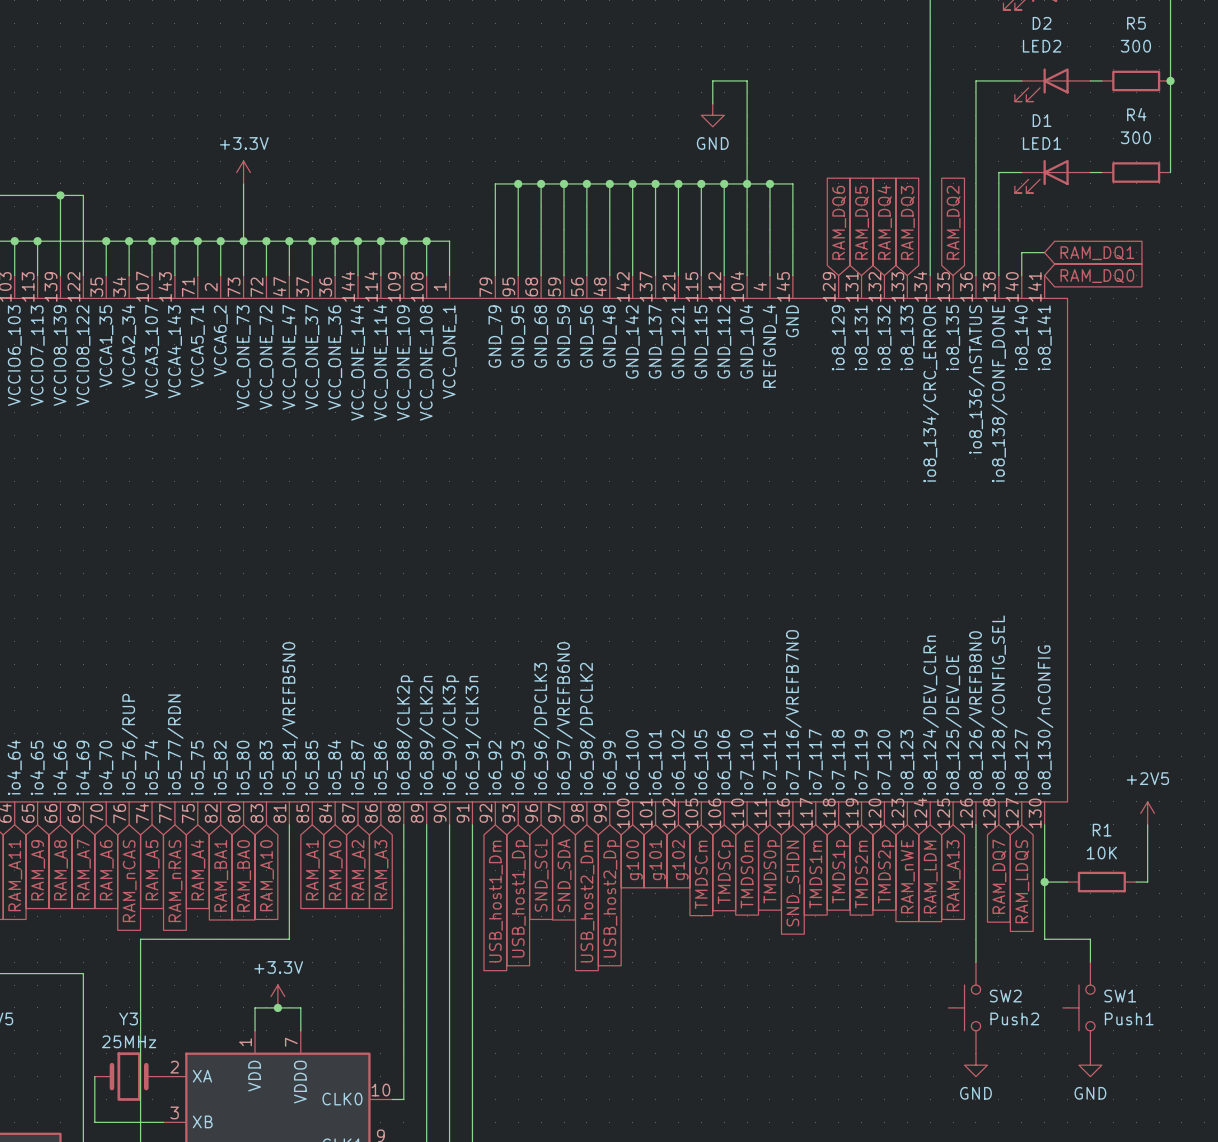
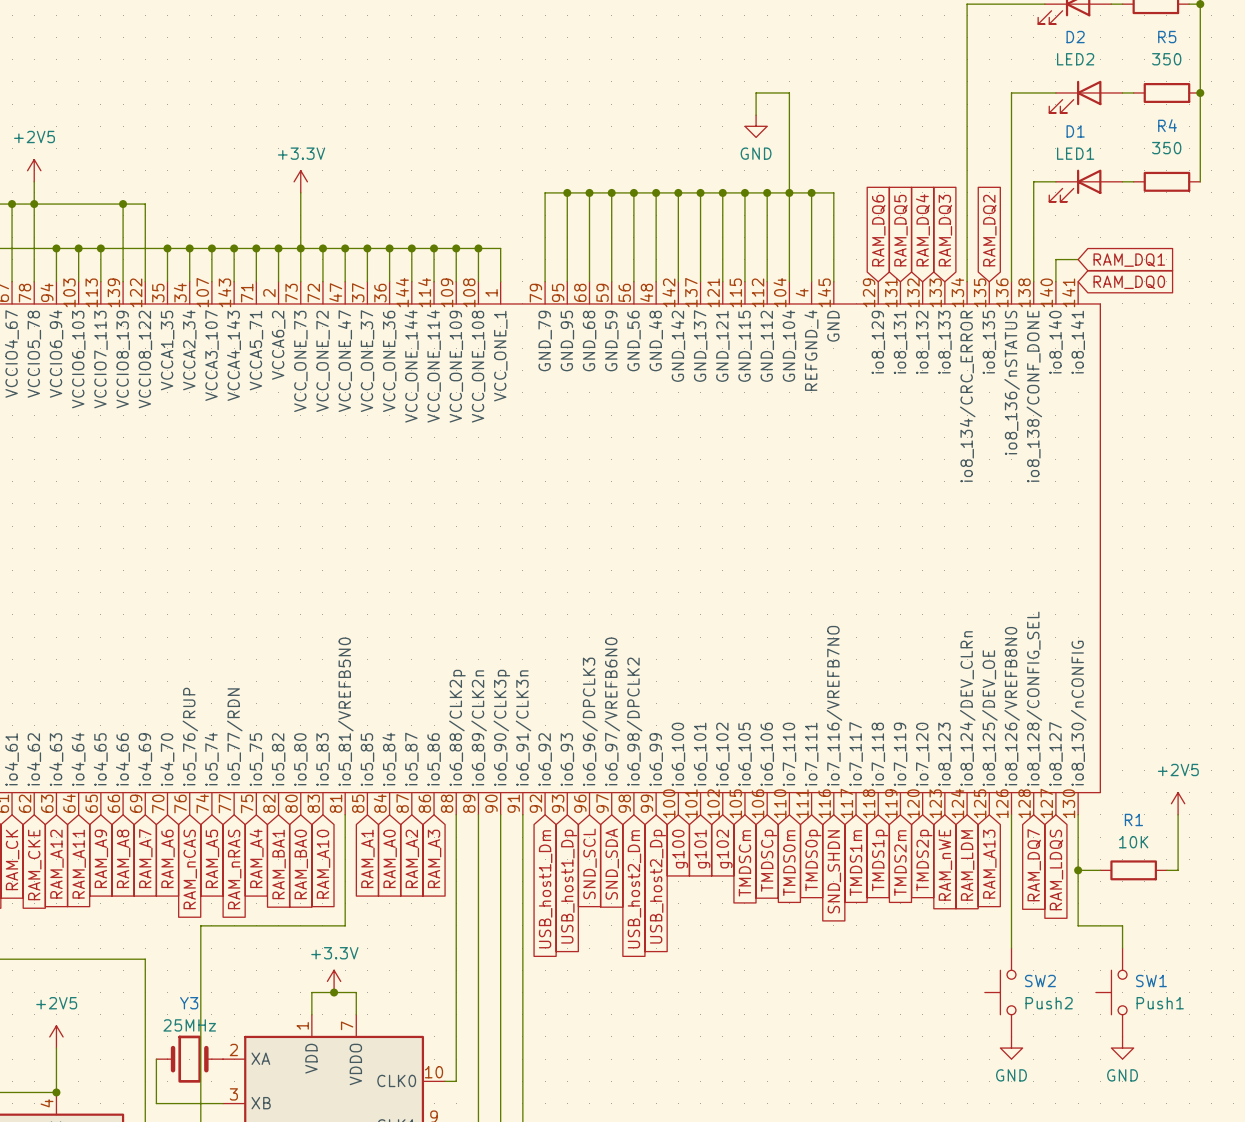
R5 value: 300 (1135, 46) -> 350 (1166, 59)
R4 value: 300 (1135, 137) -> 350 (1166, 148)

